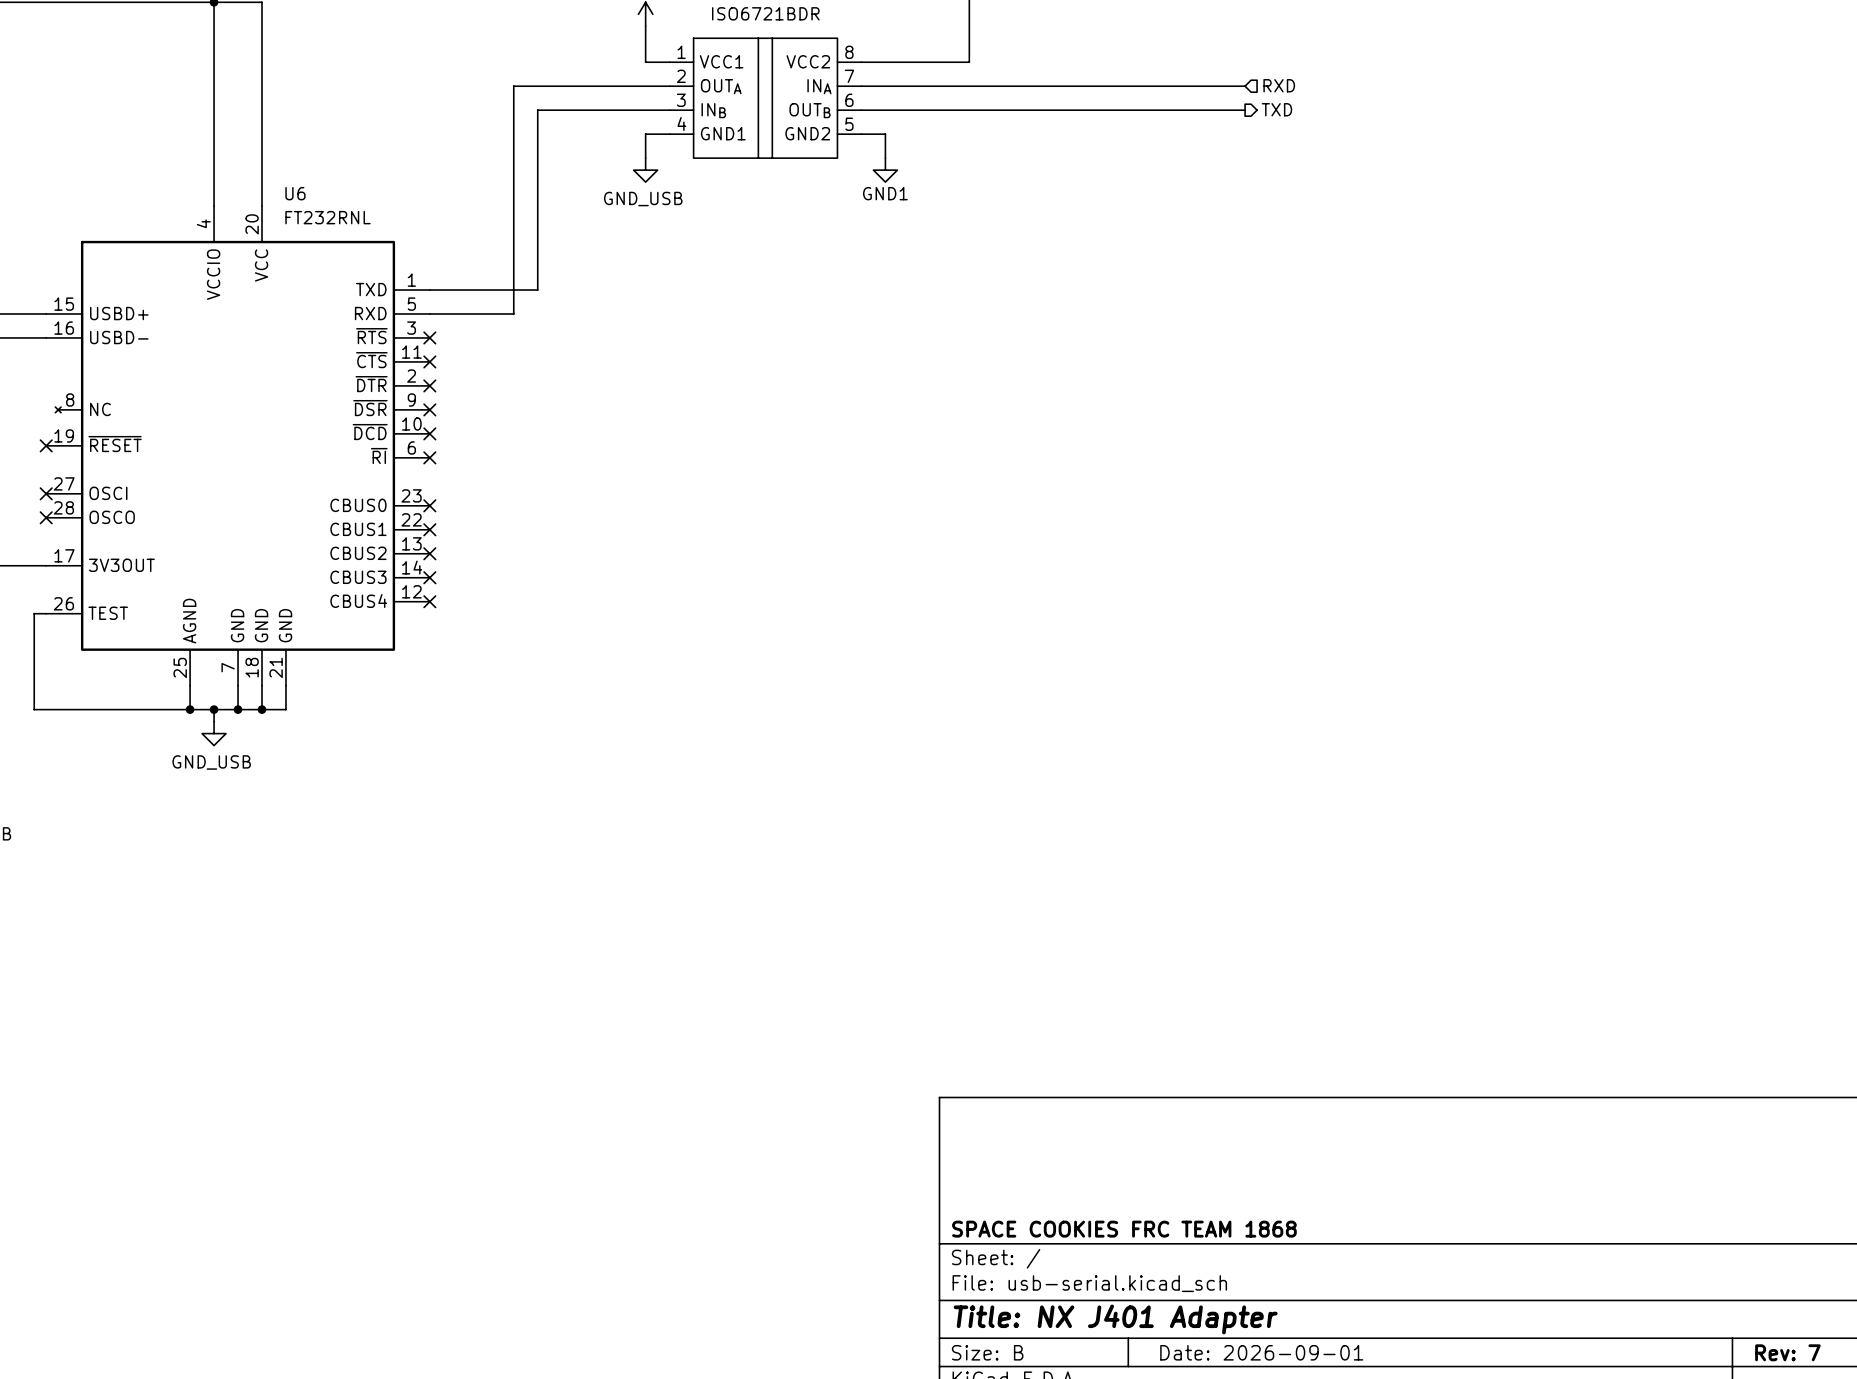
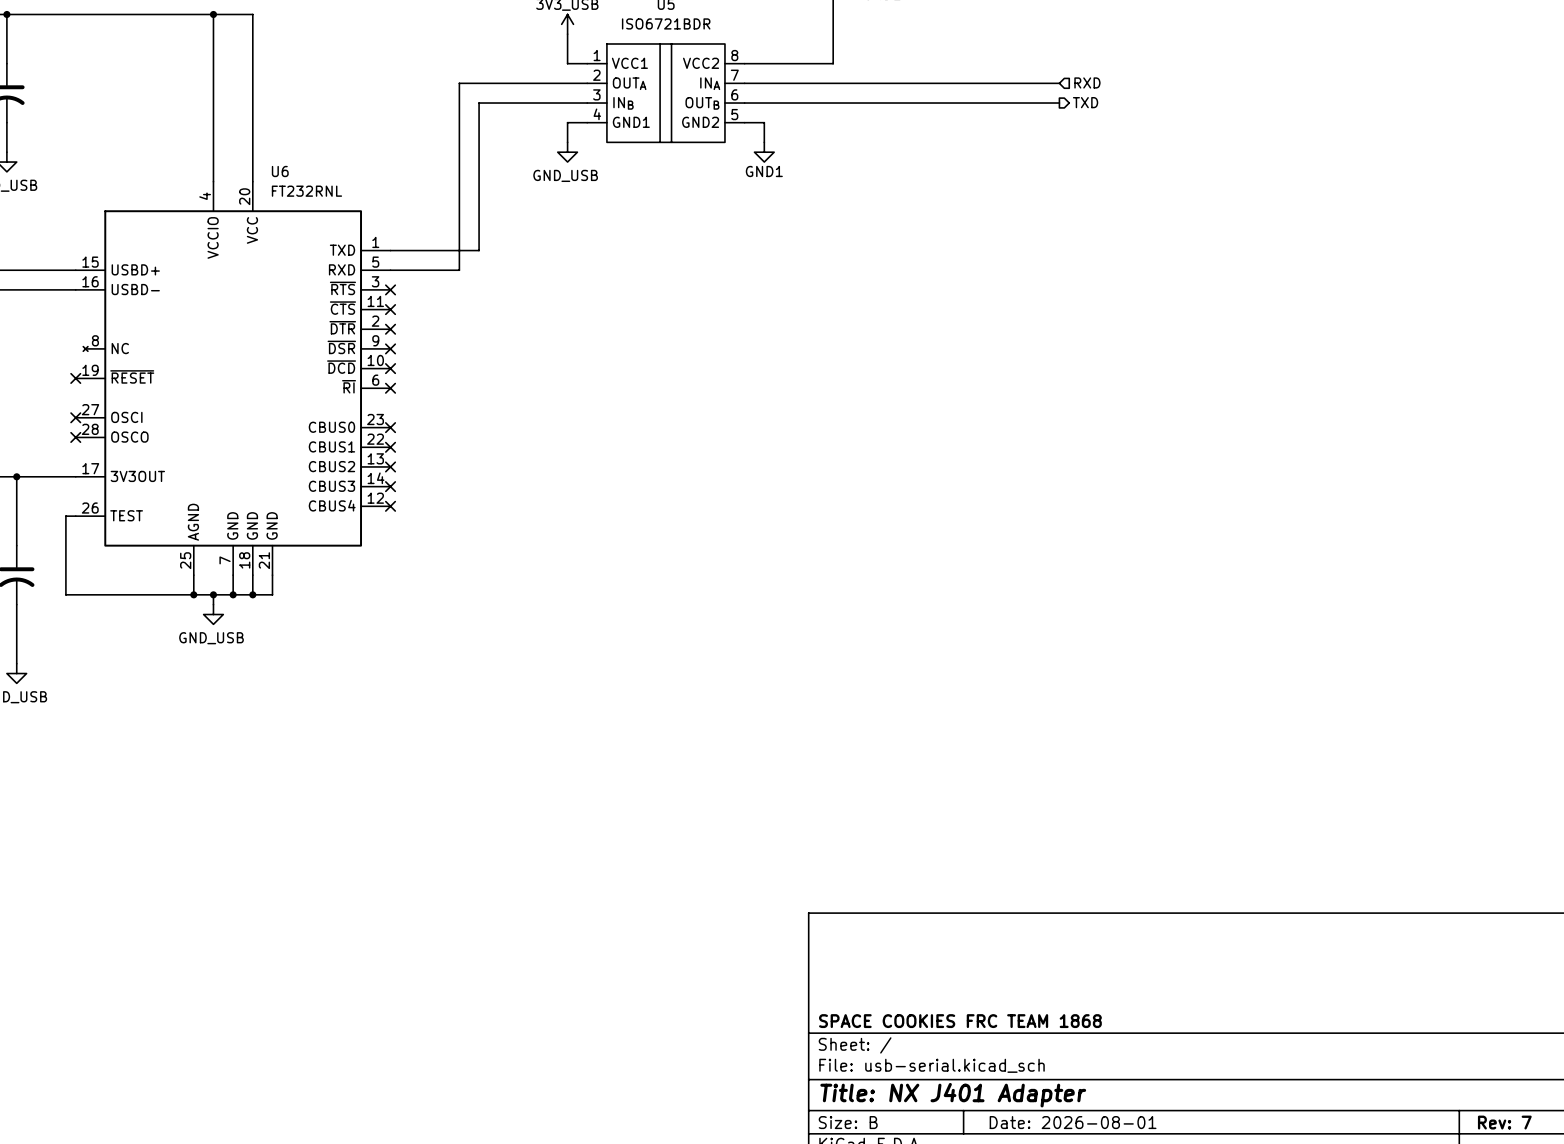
title block: Date: 2026-09-01 (1261, 1352) -> Date: 2026-08-01 (1073, 1122)

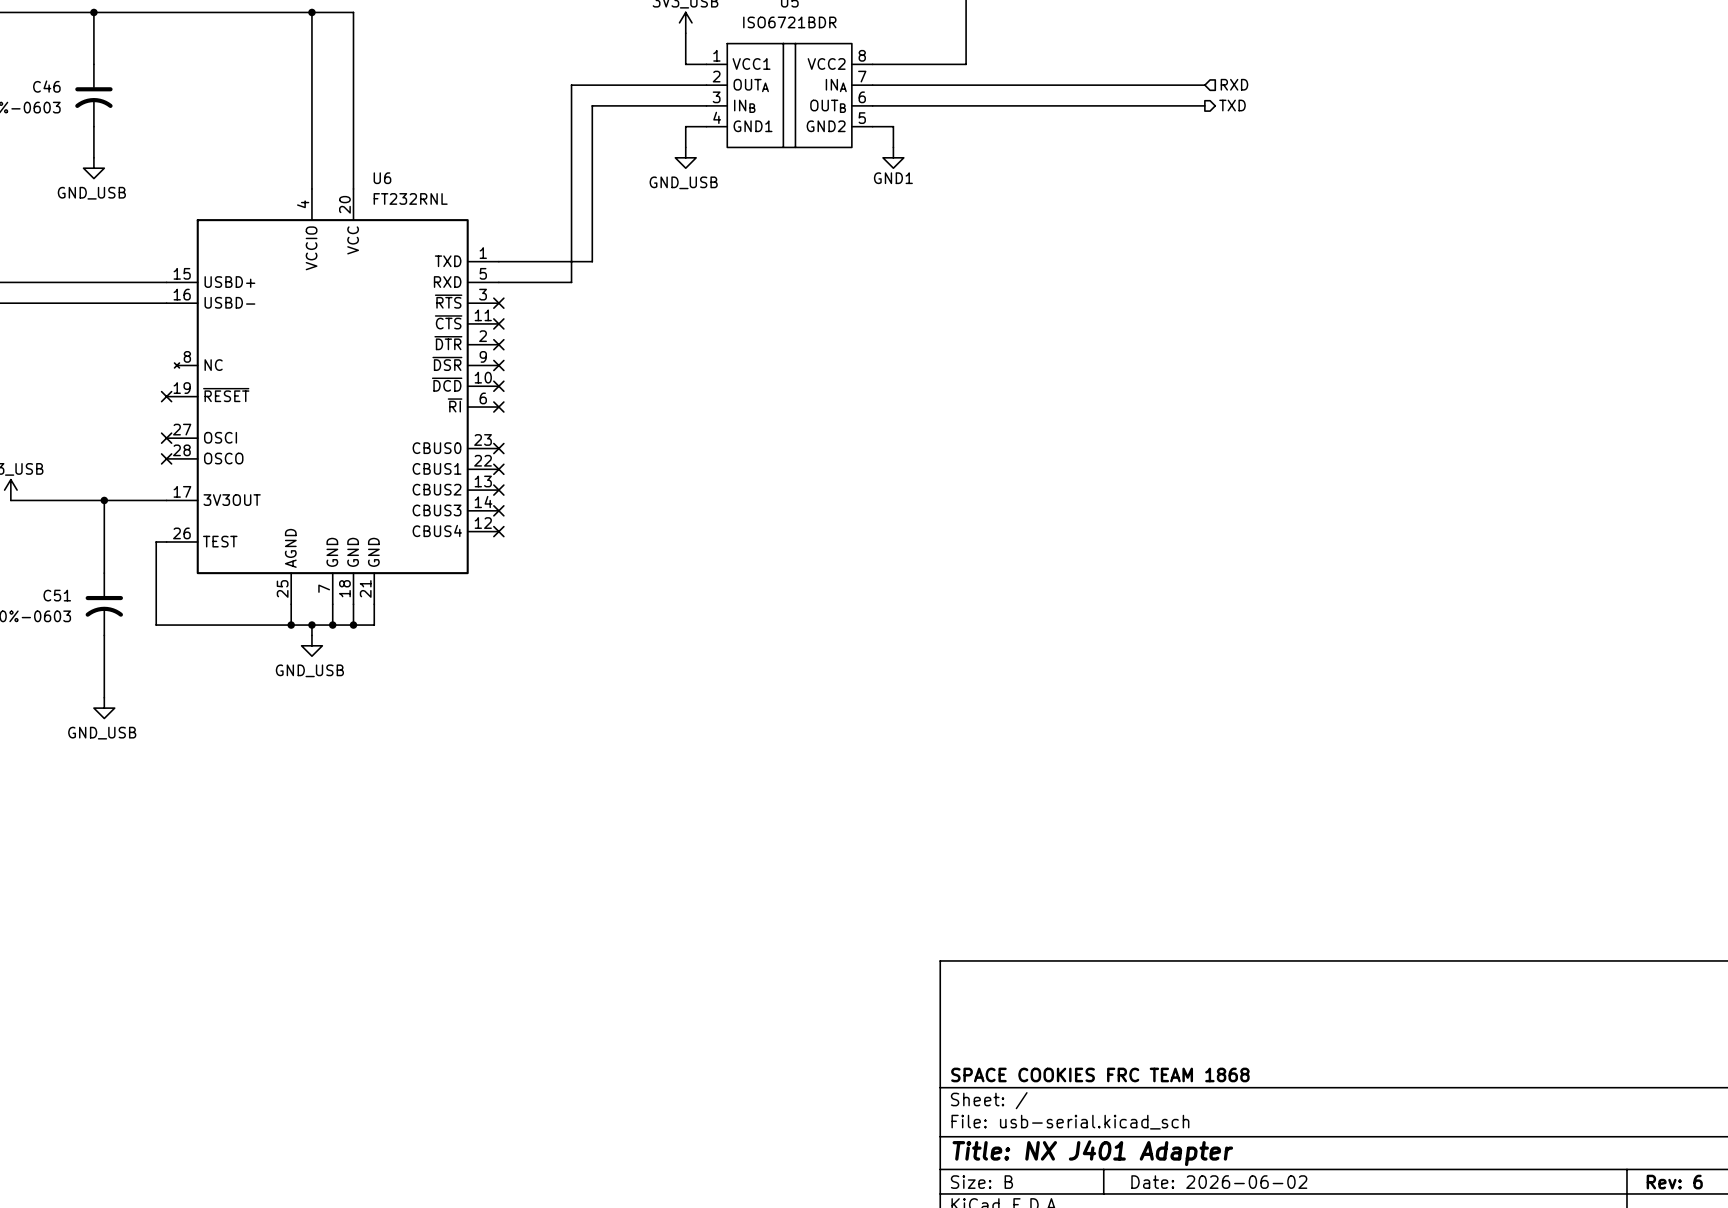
title block: Date: 2026-08-01 (1073, 1122) -> Date: 2026-06-02 (1219, 1182)
title block: Rev: 7 (1504, 1122) -> Rev: 6 (1674, 1182)

